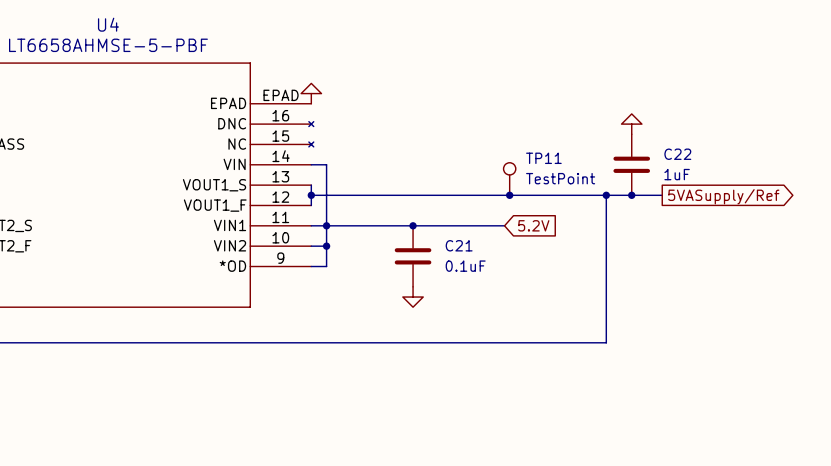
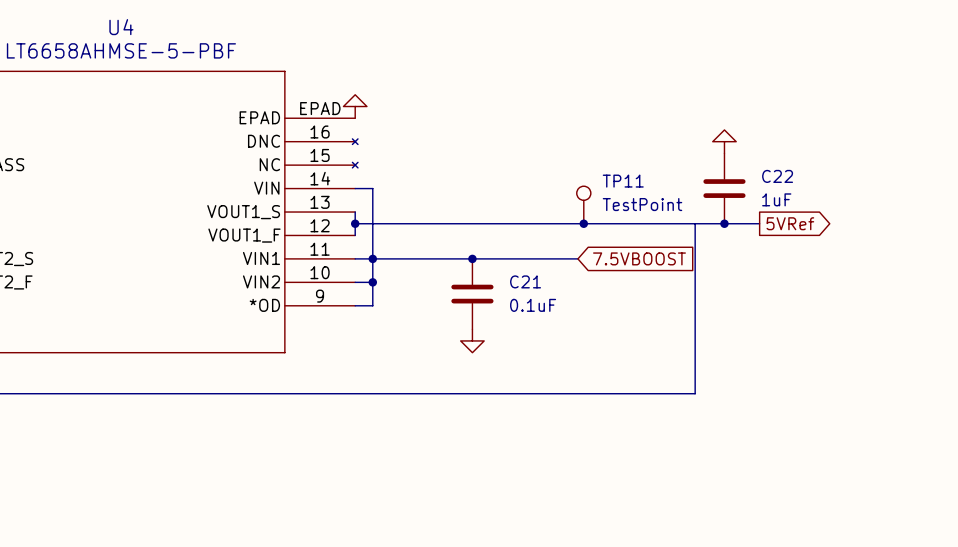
junction: (606, 195) -> none
global label: 5VASupply/Ref (723, 196) -> 5VRef (790, 223)
global label: 5.2V (533, 225) -> 7.5VBOOST (639, 258)

